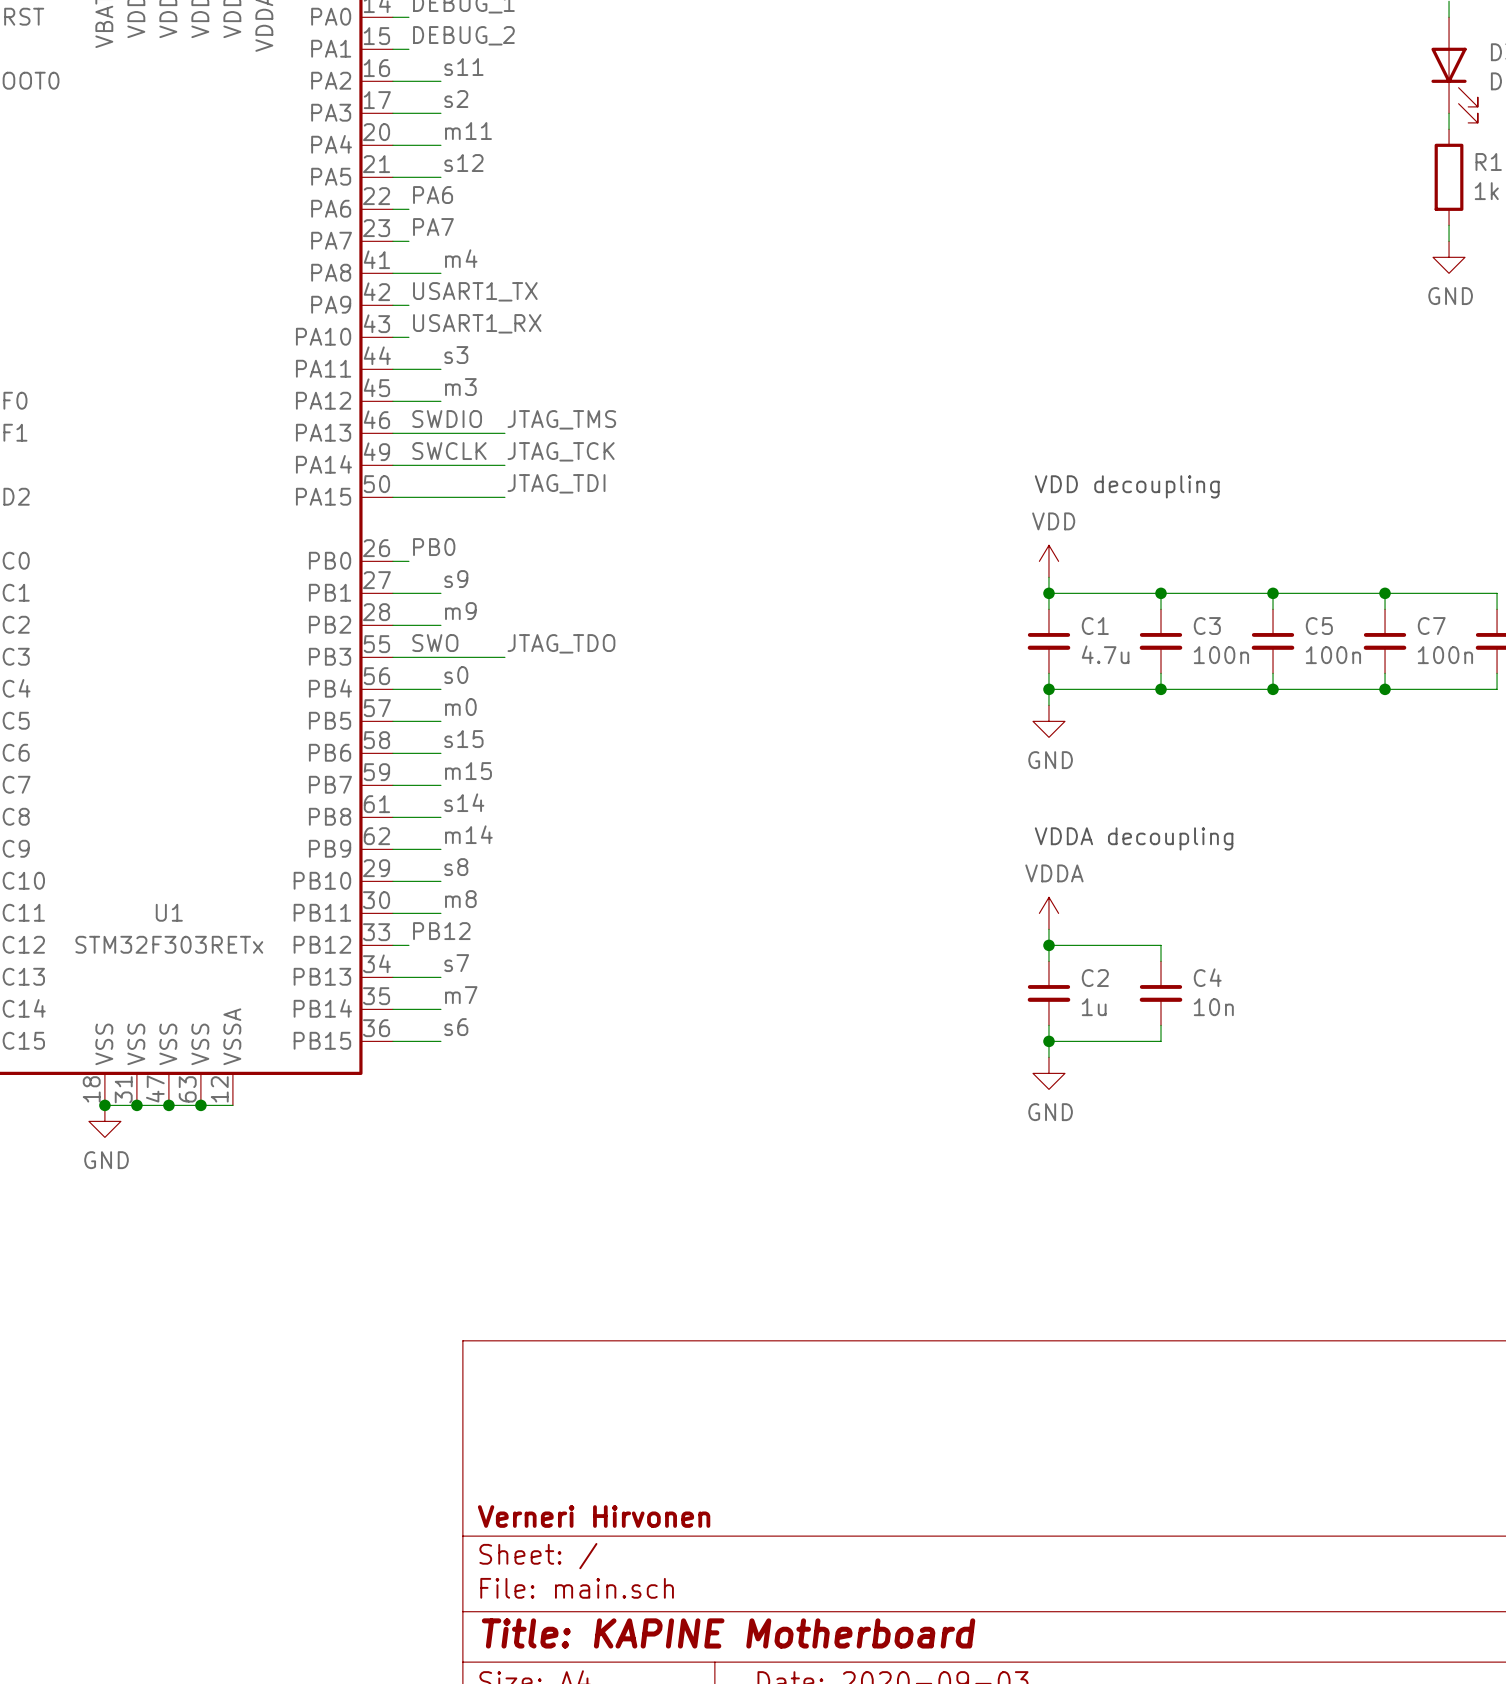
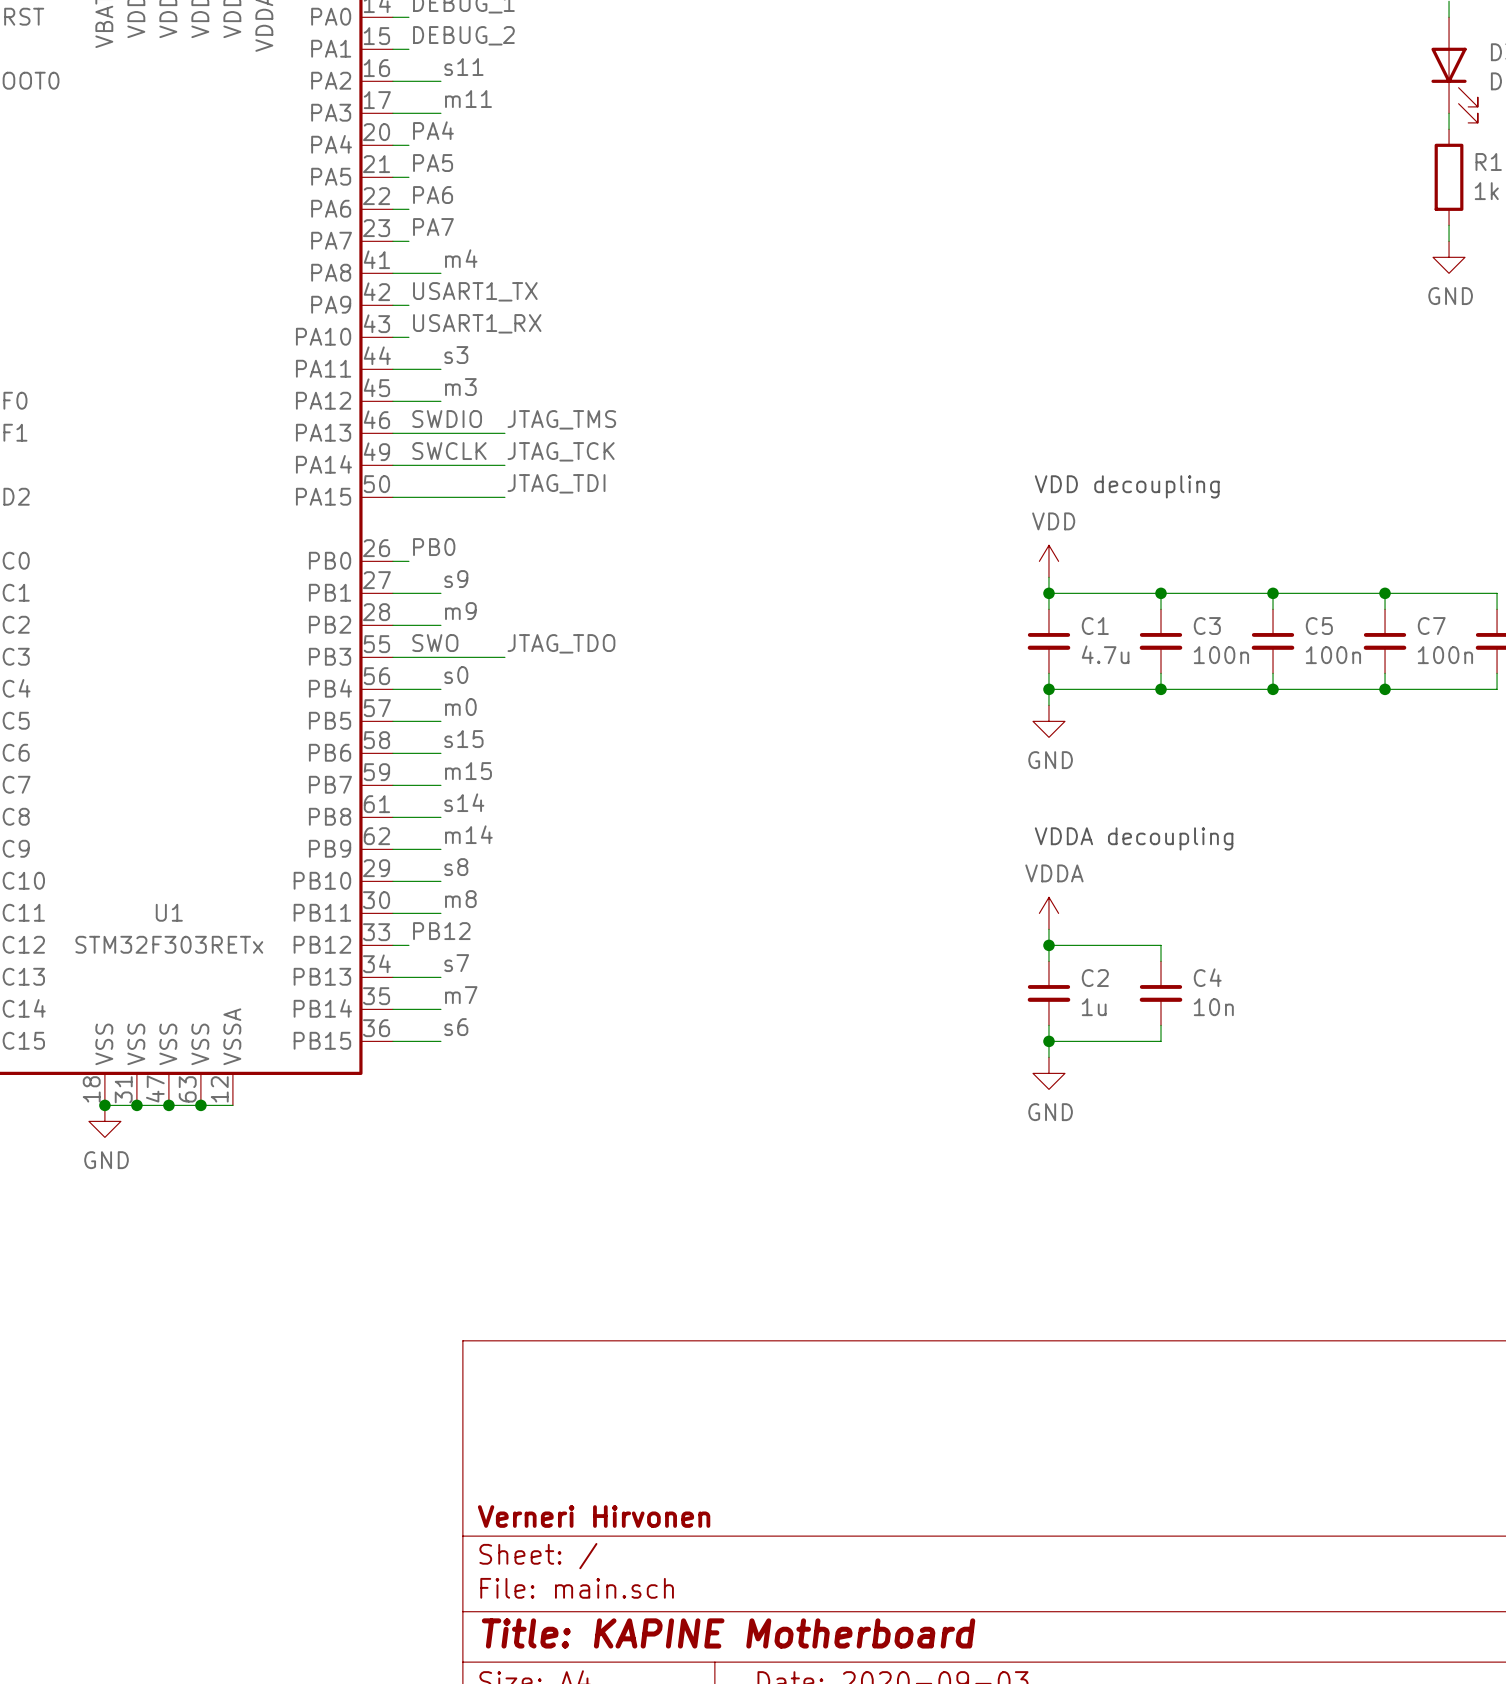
label: s2 (456, 99) -> m11 (468, 99)
label: none -> PA4 (433, 130)
label: m11 (468, 131) -> none
wire: (408, 145) (440, 145) -> none
label: none -> PA5 (433, 163)
label: s12 (463, 163) -> none
wire: (408, 177) (440, 177) -> none

